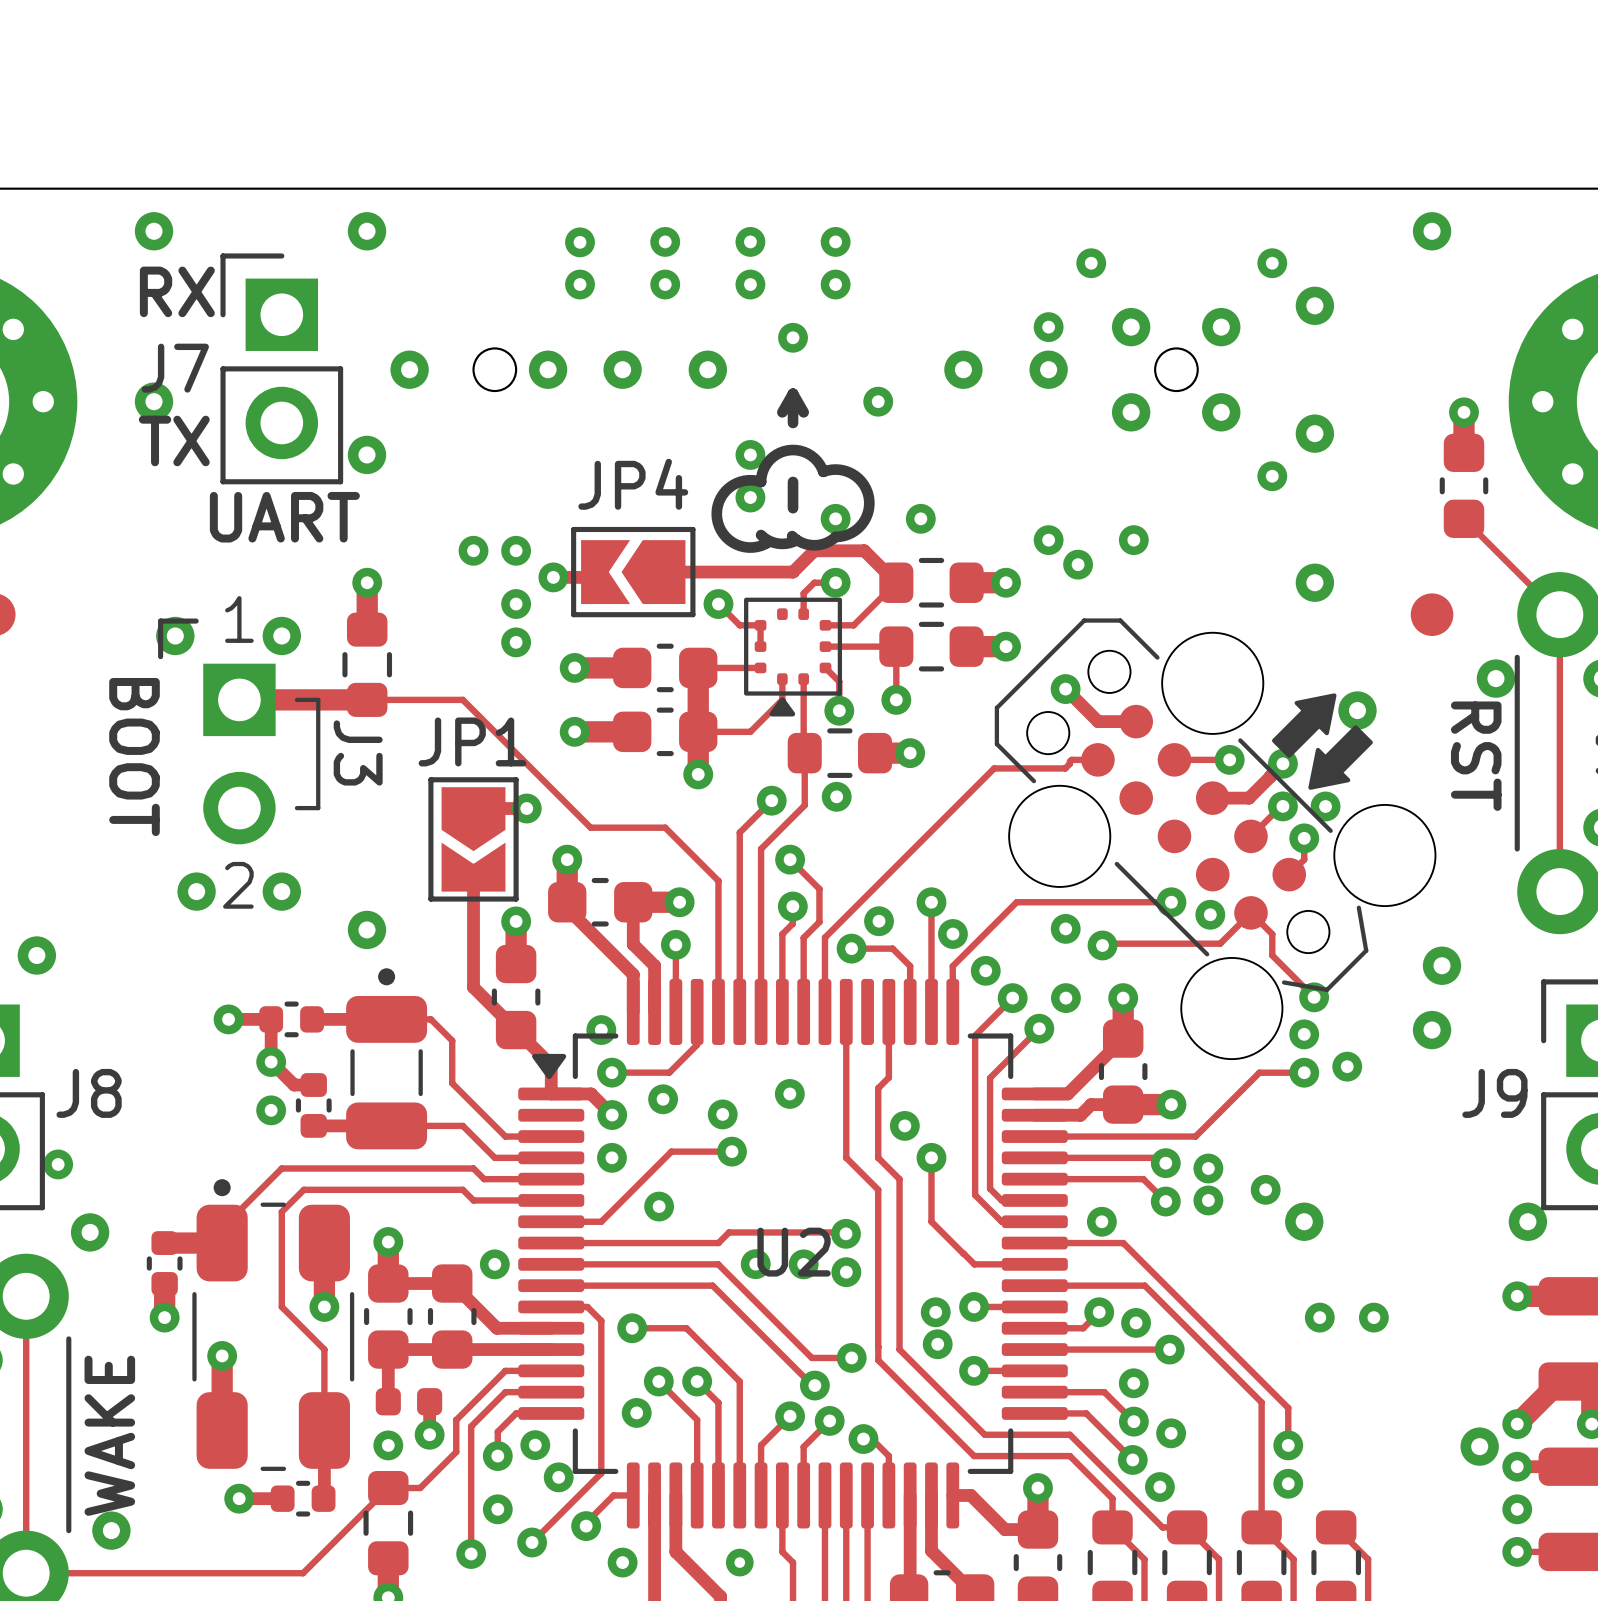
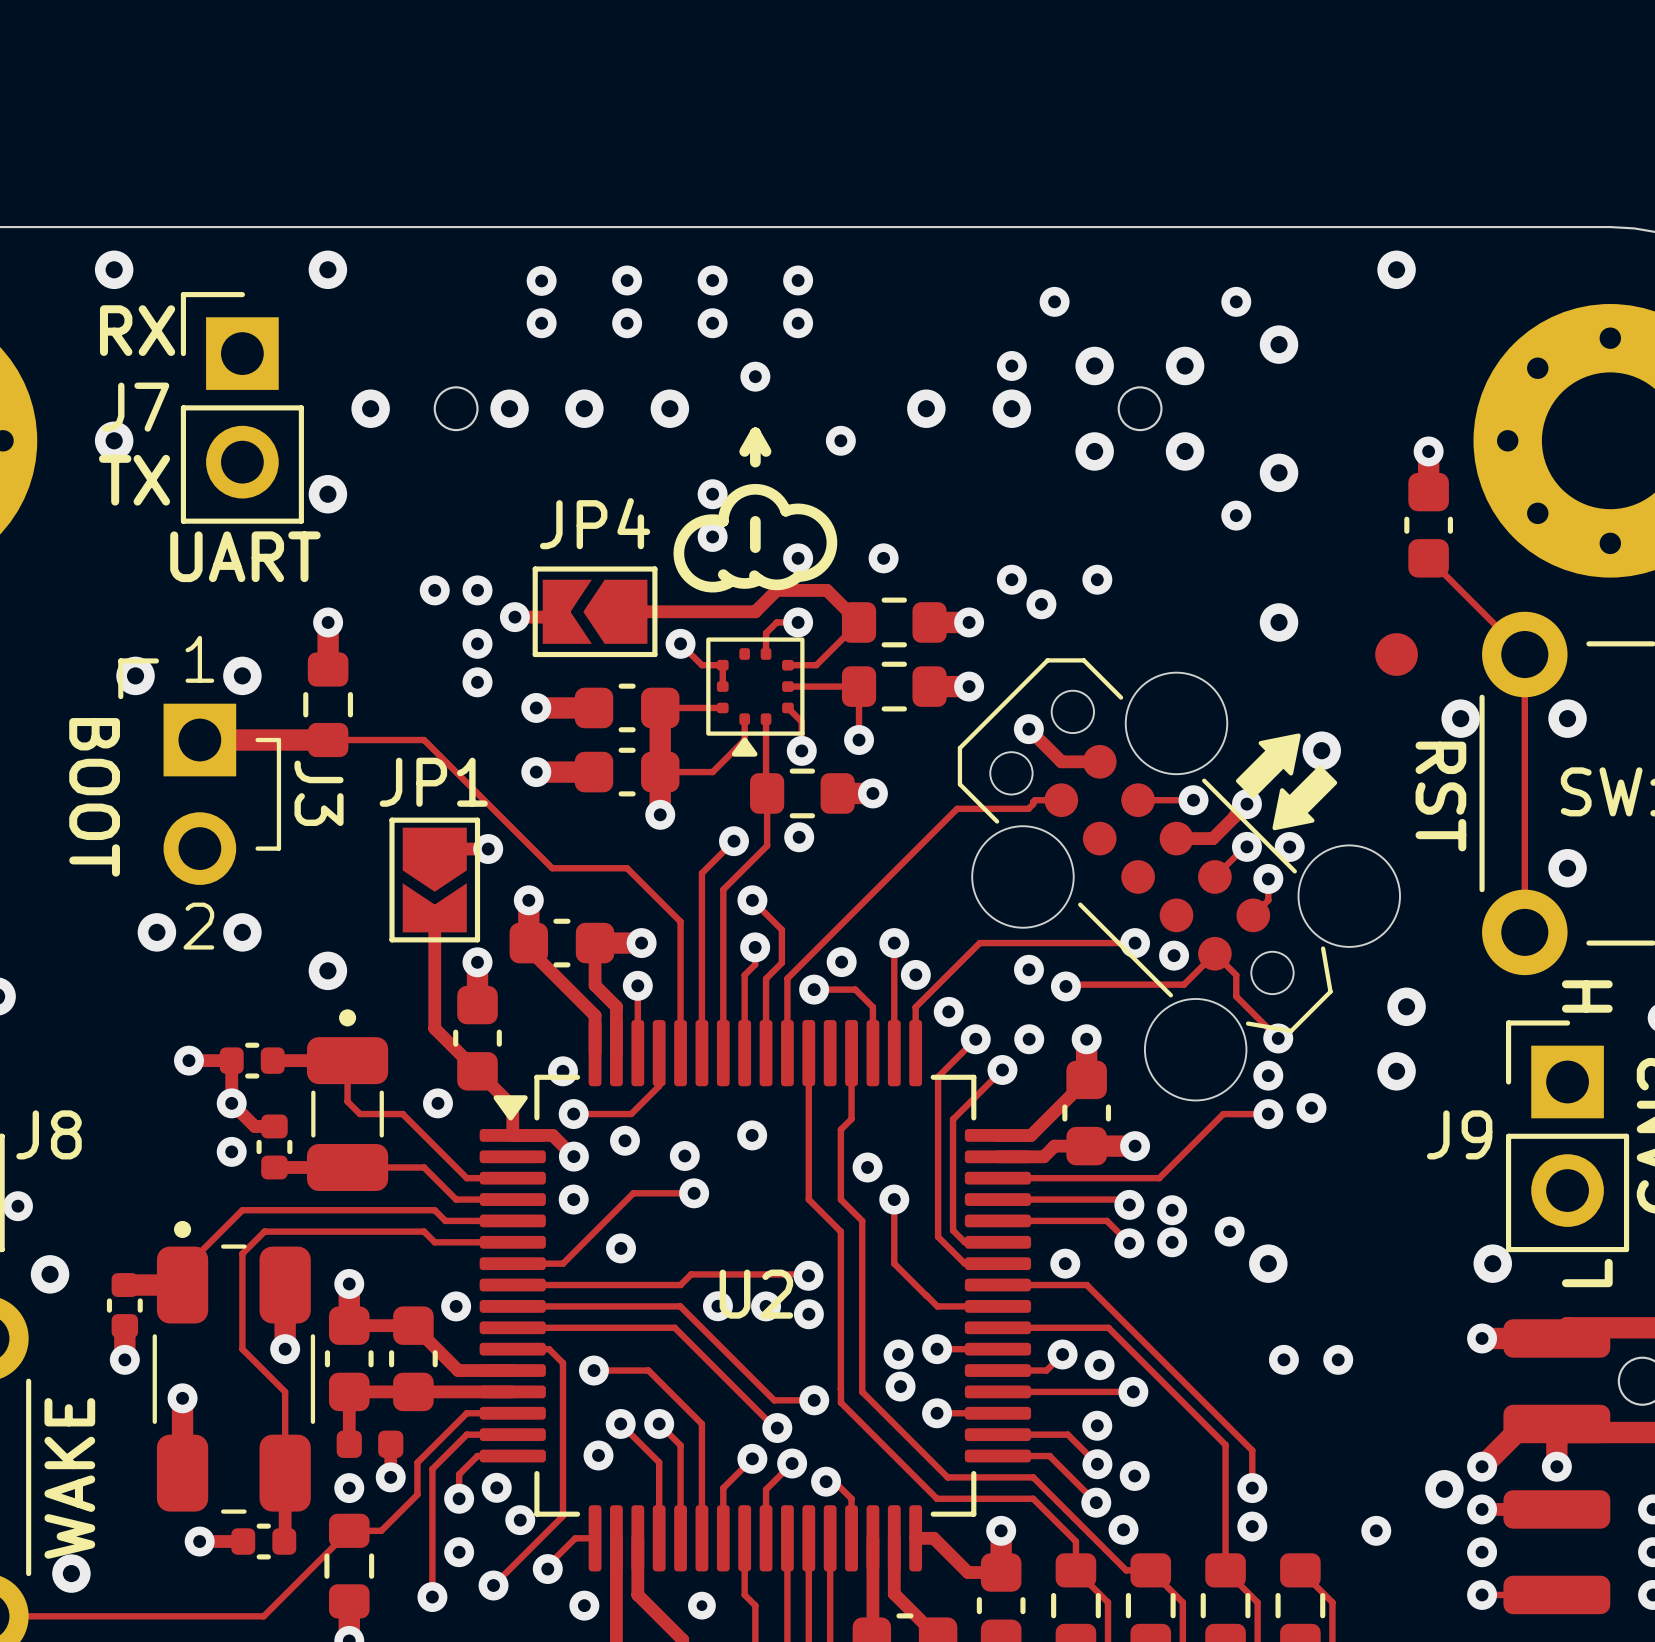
track: (386, 1019) (430, 1019) (452, 1040) (452, 1083) -> (347, 1060) (347, 1101) (359, 1114) (402, 1114) (413, 1124)
via: none -> (437, 1103)
via: none -> (1376, 1530)

